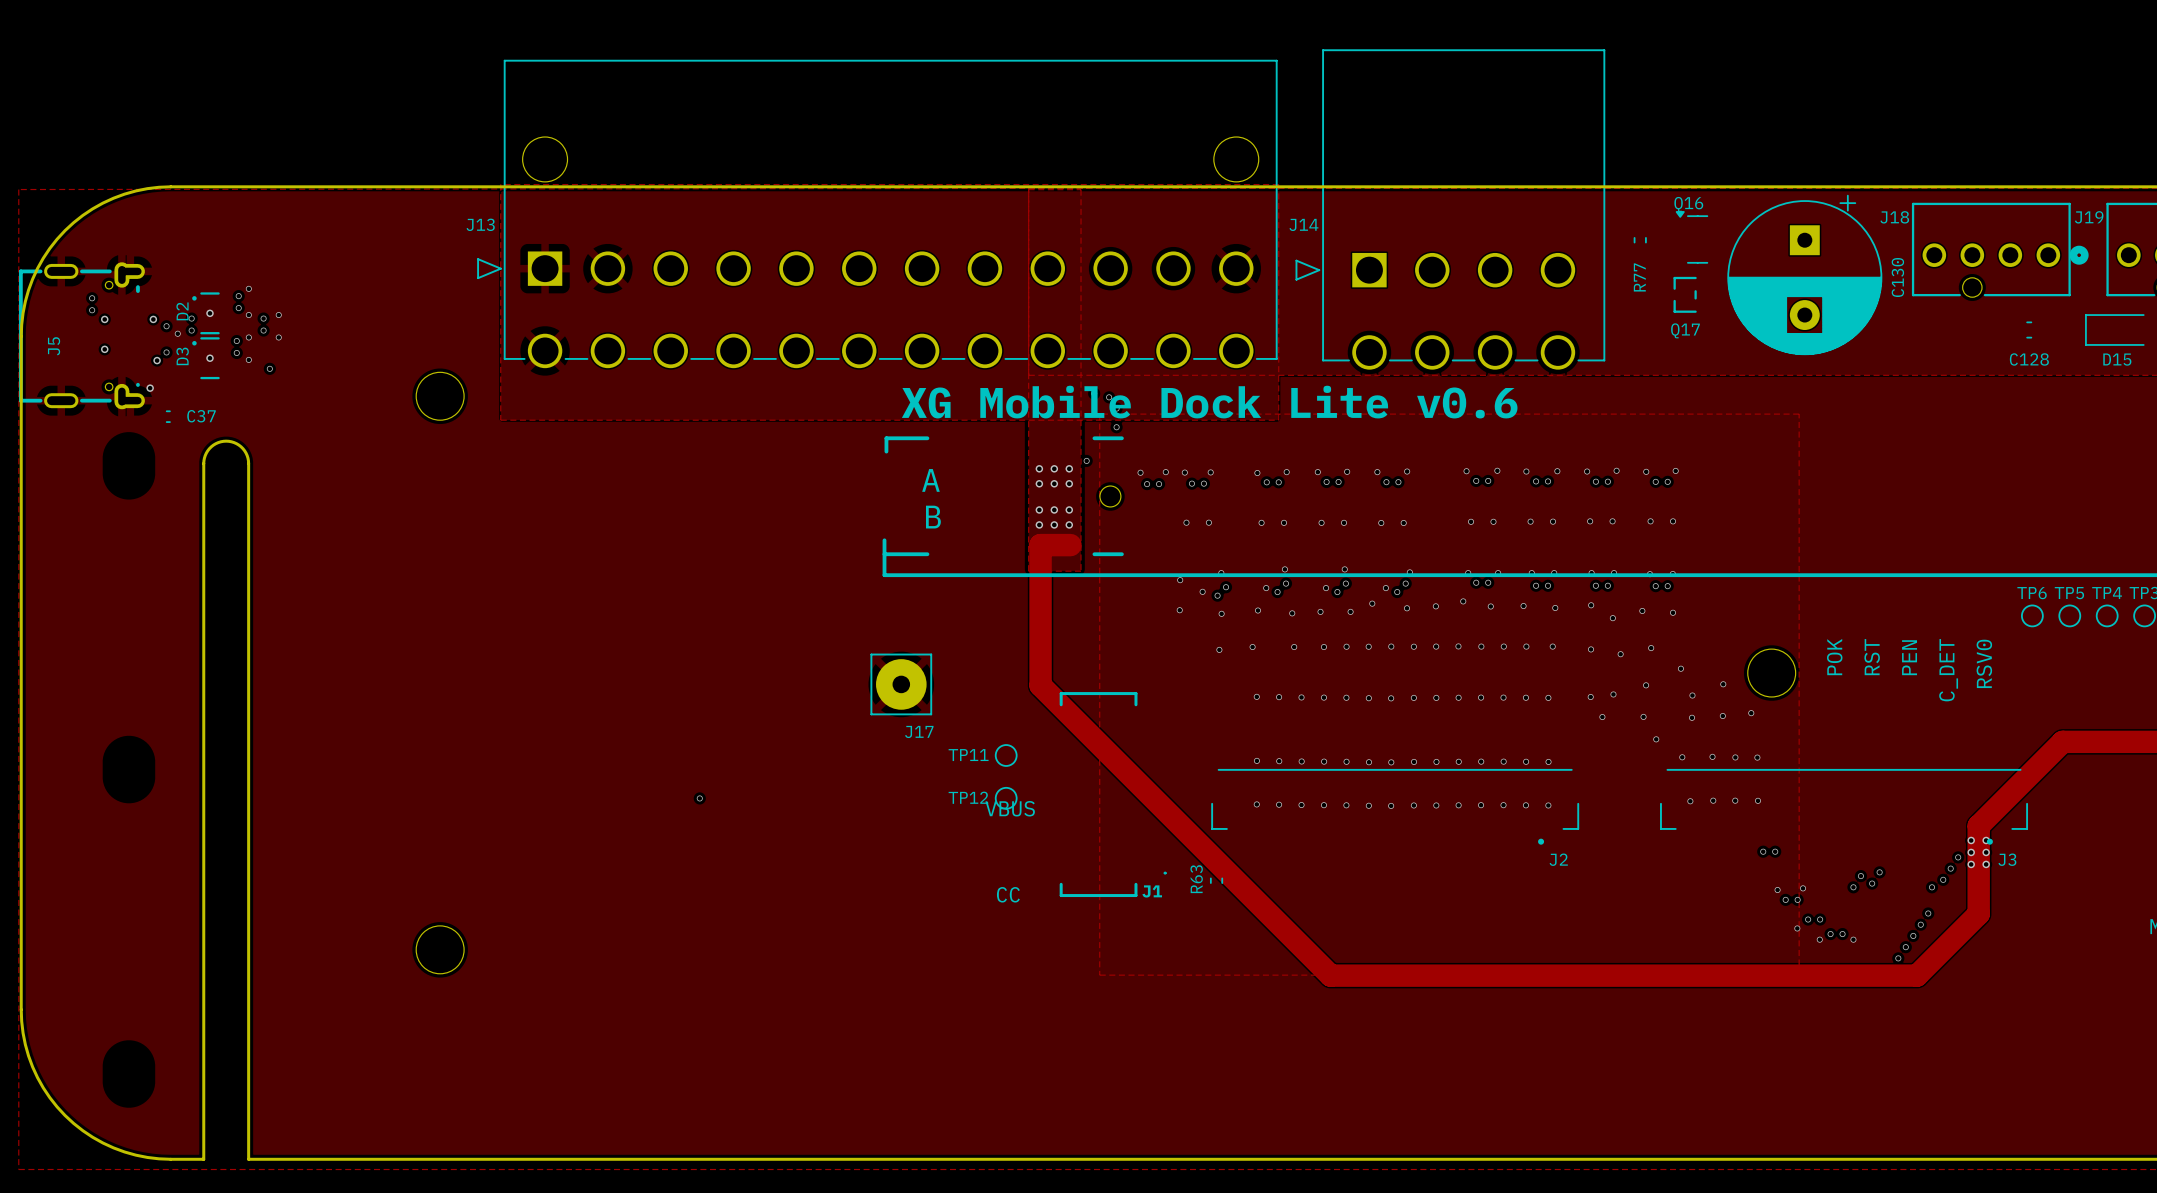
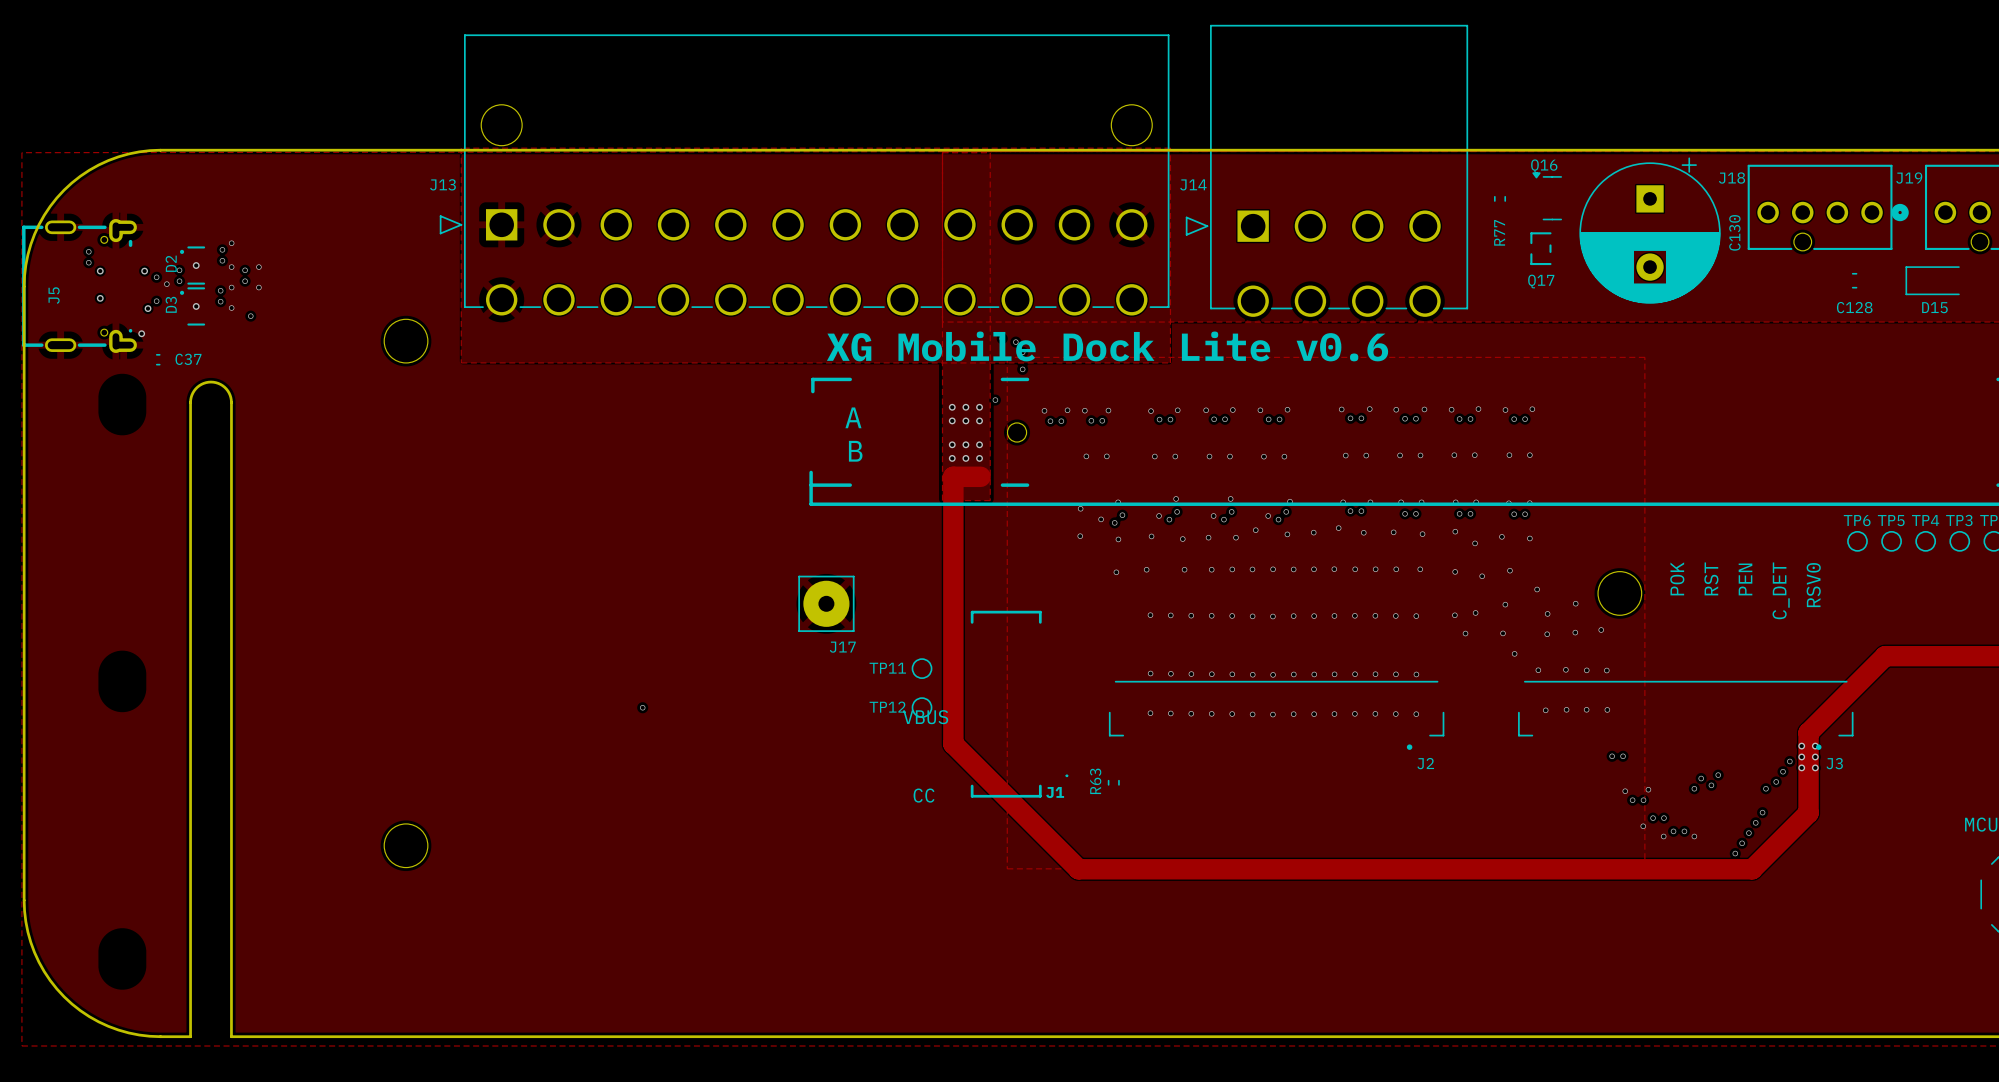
track: (1040, 685) (1330, 975) -> (953, 604) (953, 743) (1078, 869) (1217, 869)

